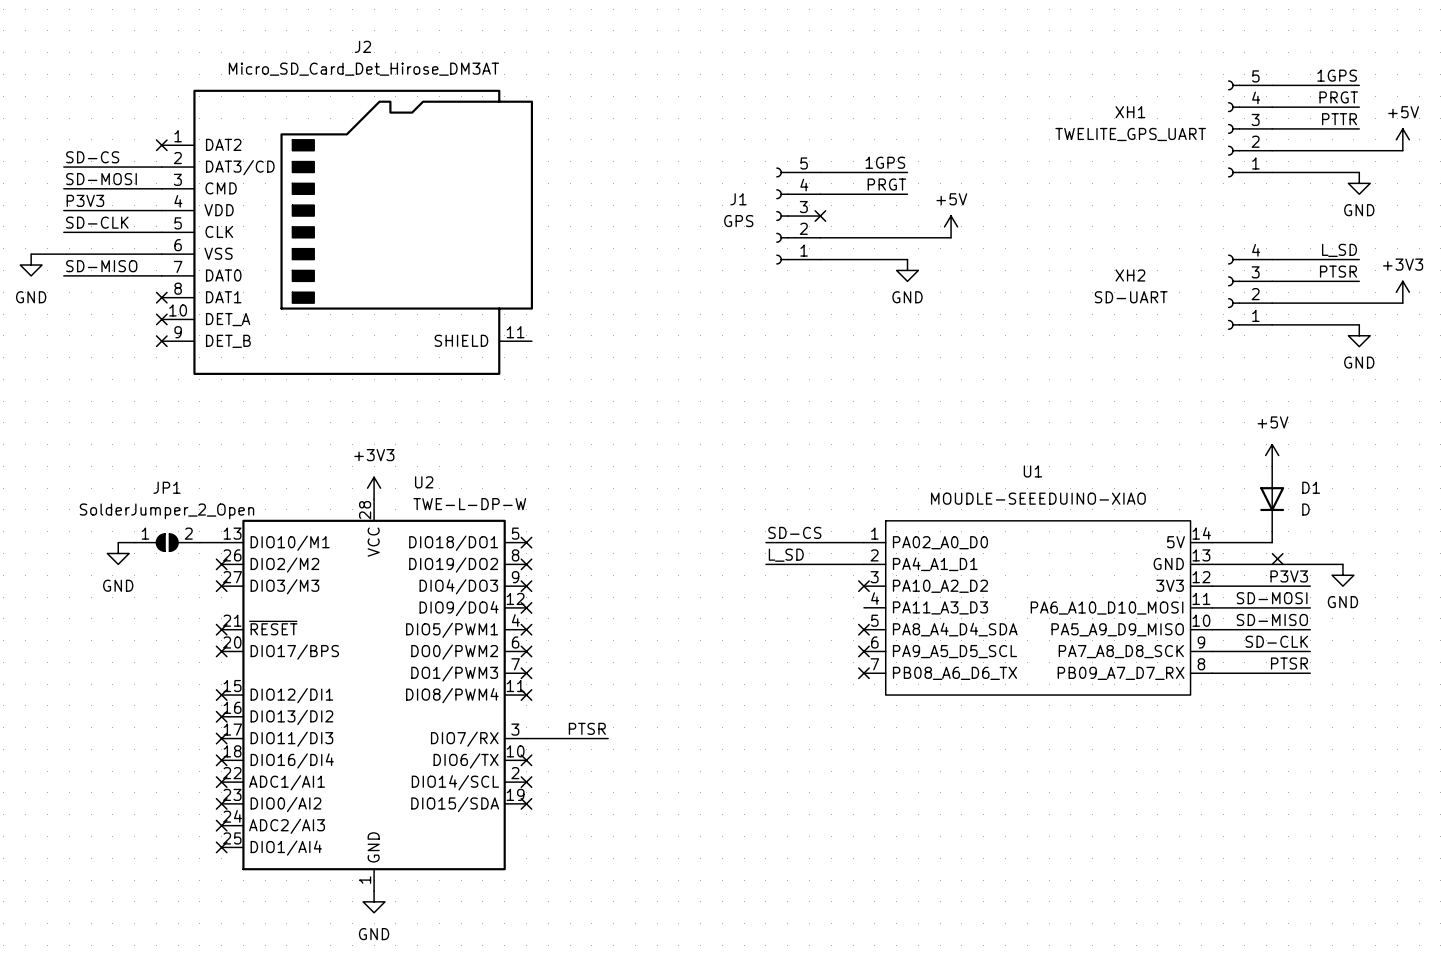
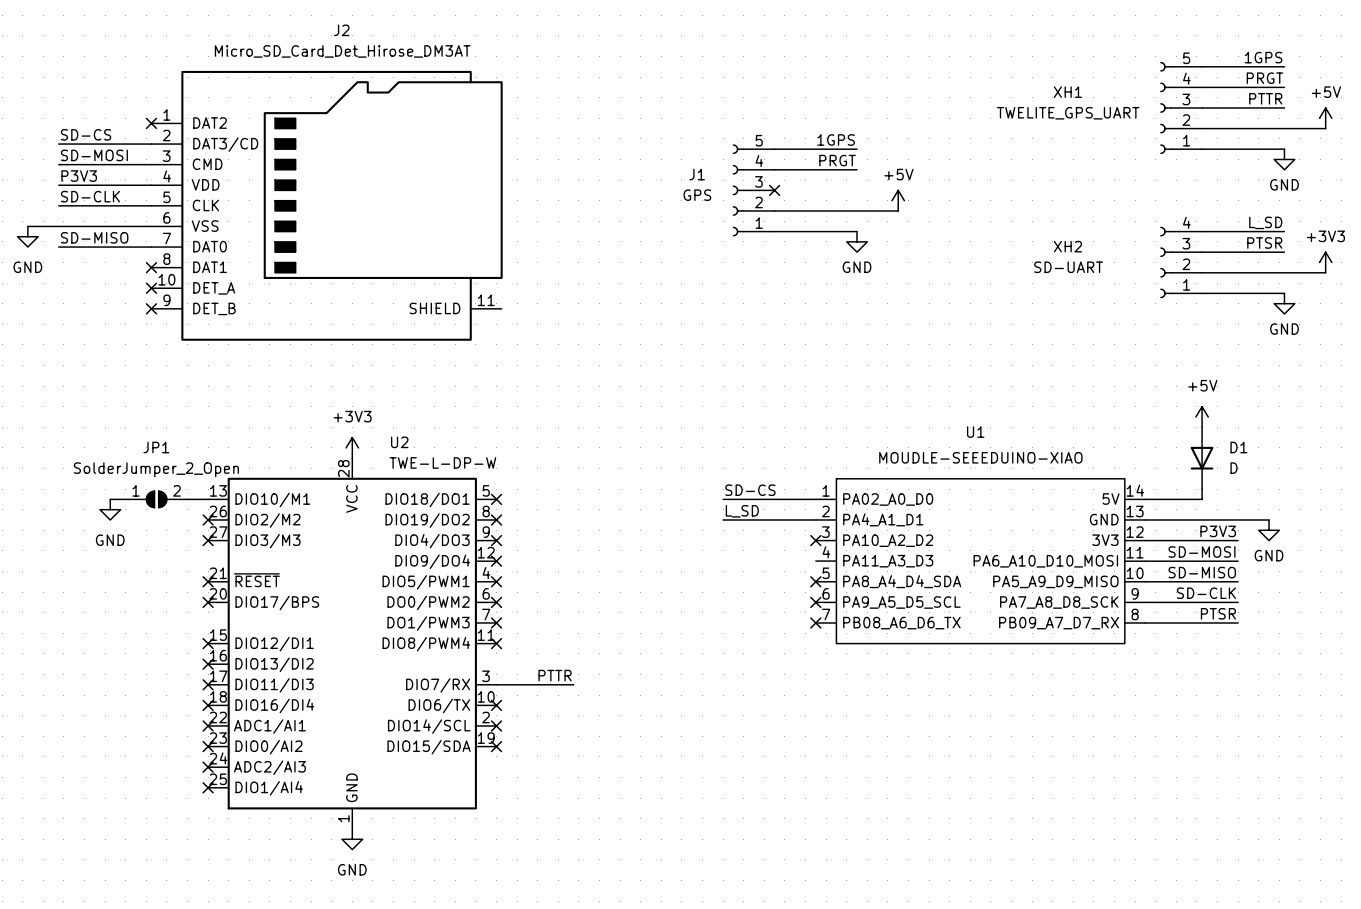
no-connect mark: (1277, 558) -> none
label: PTSR (587, 728) -> PTTR (555, 675)

